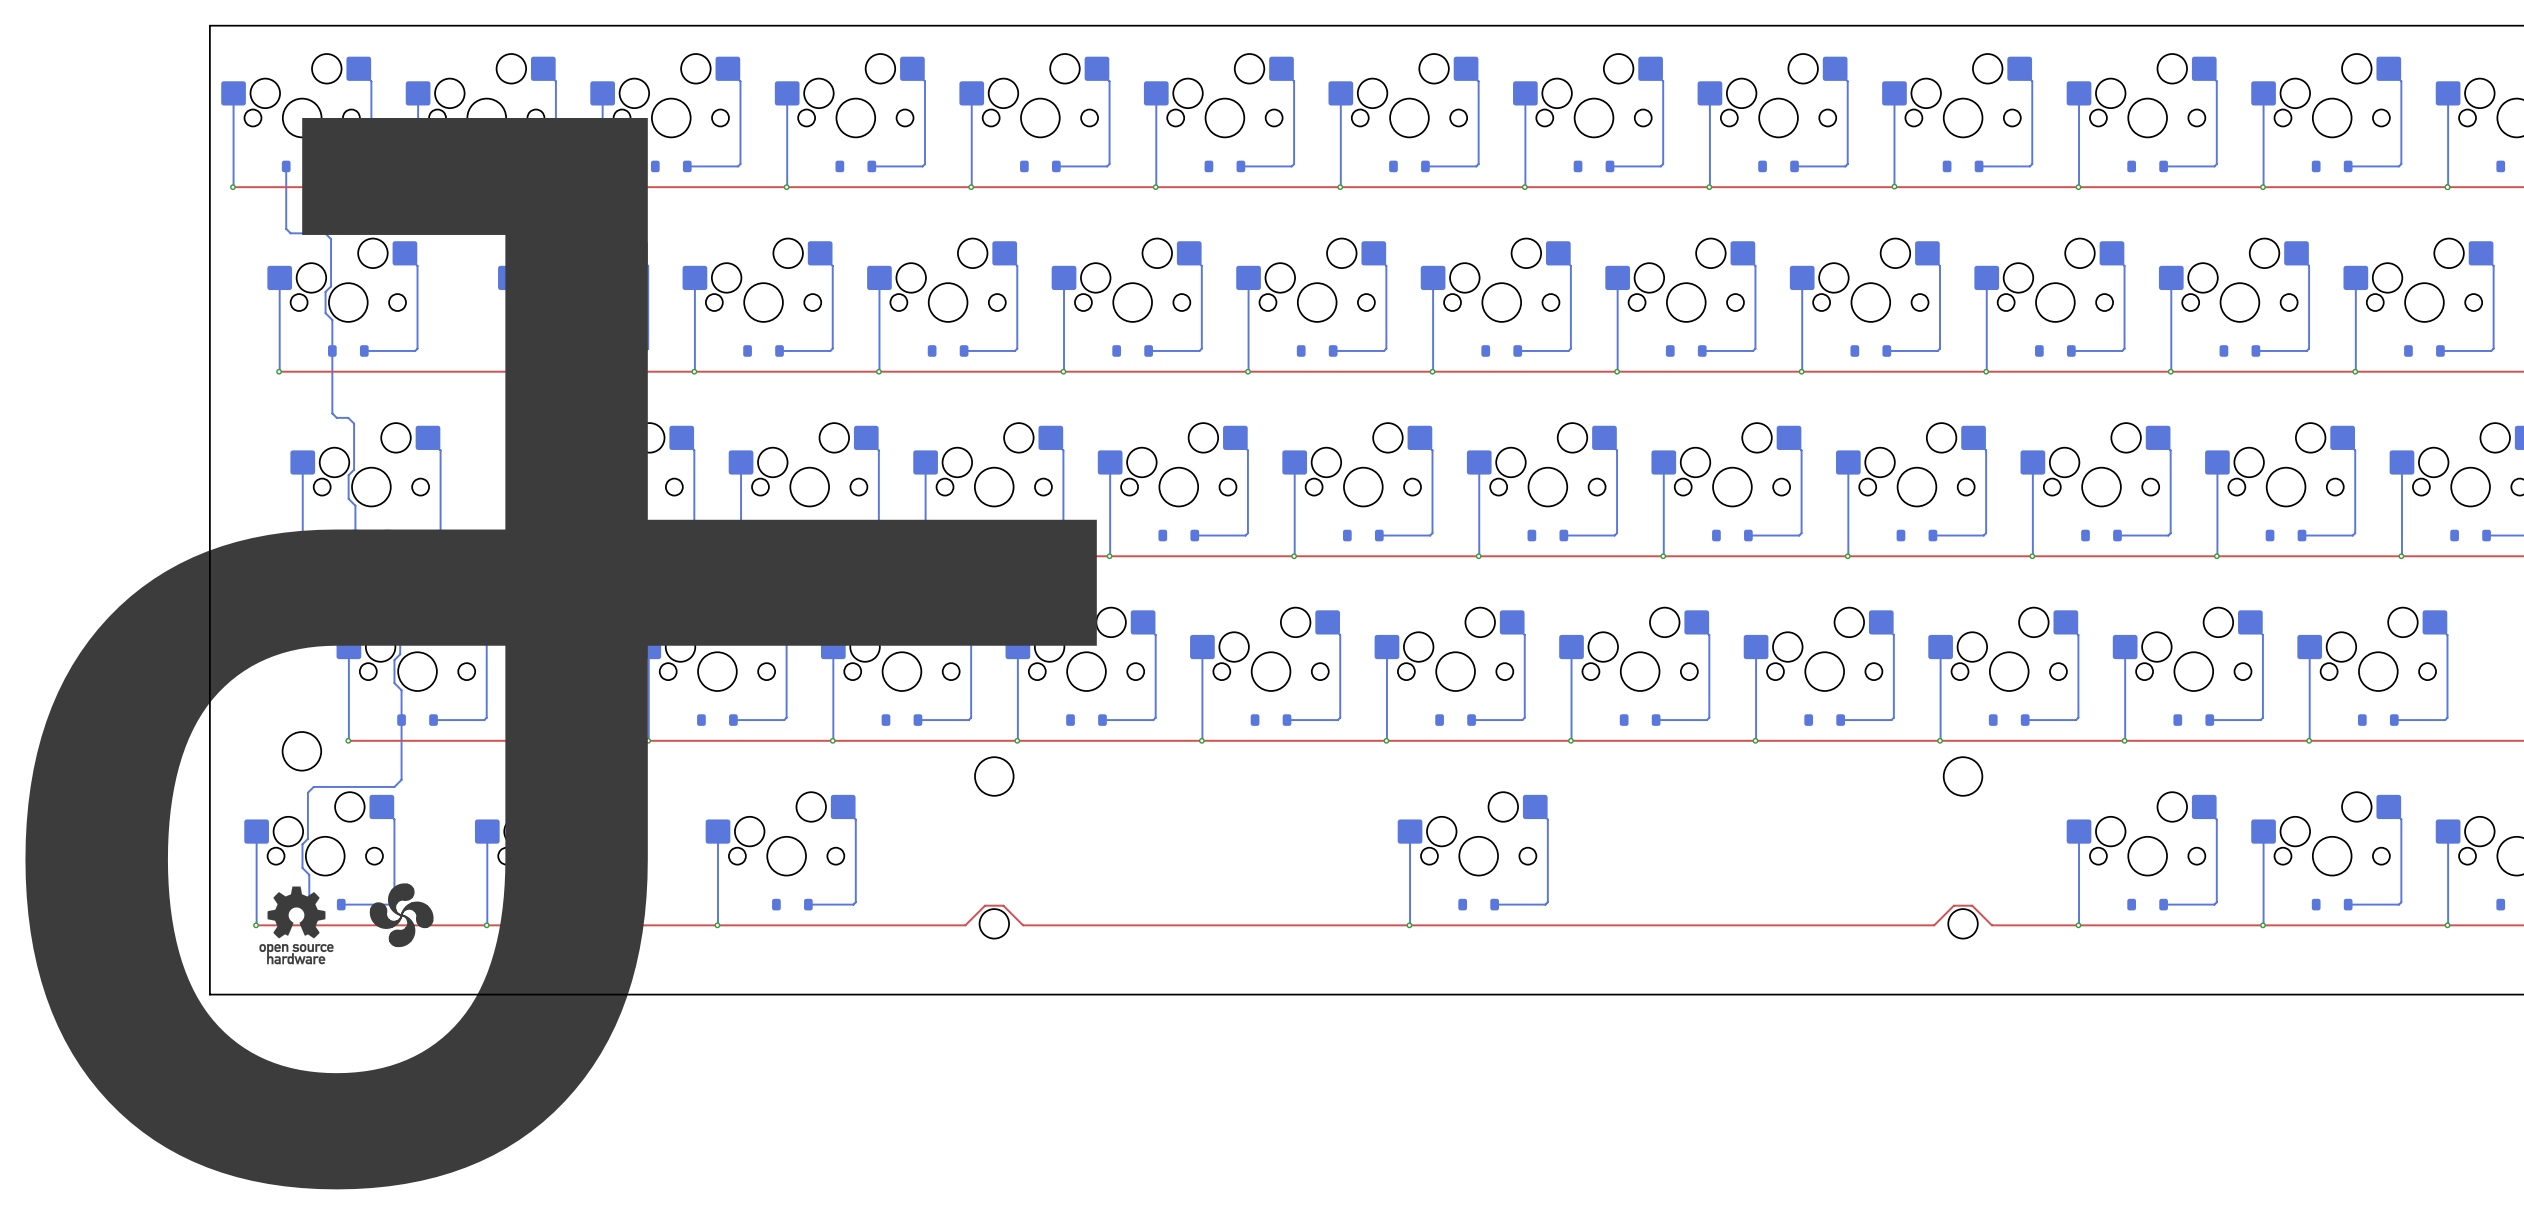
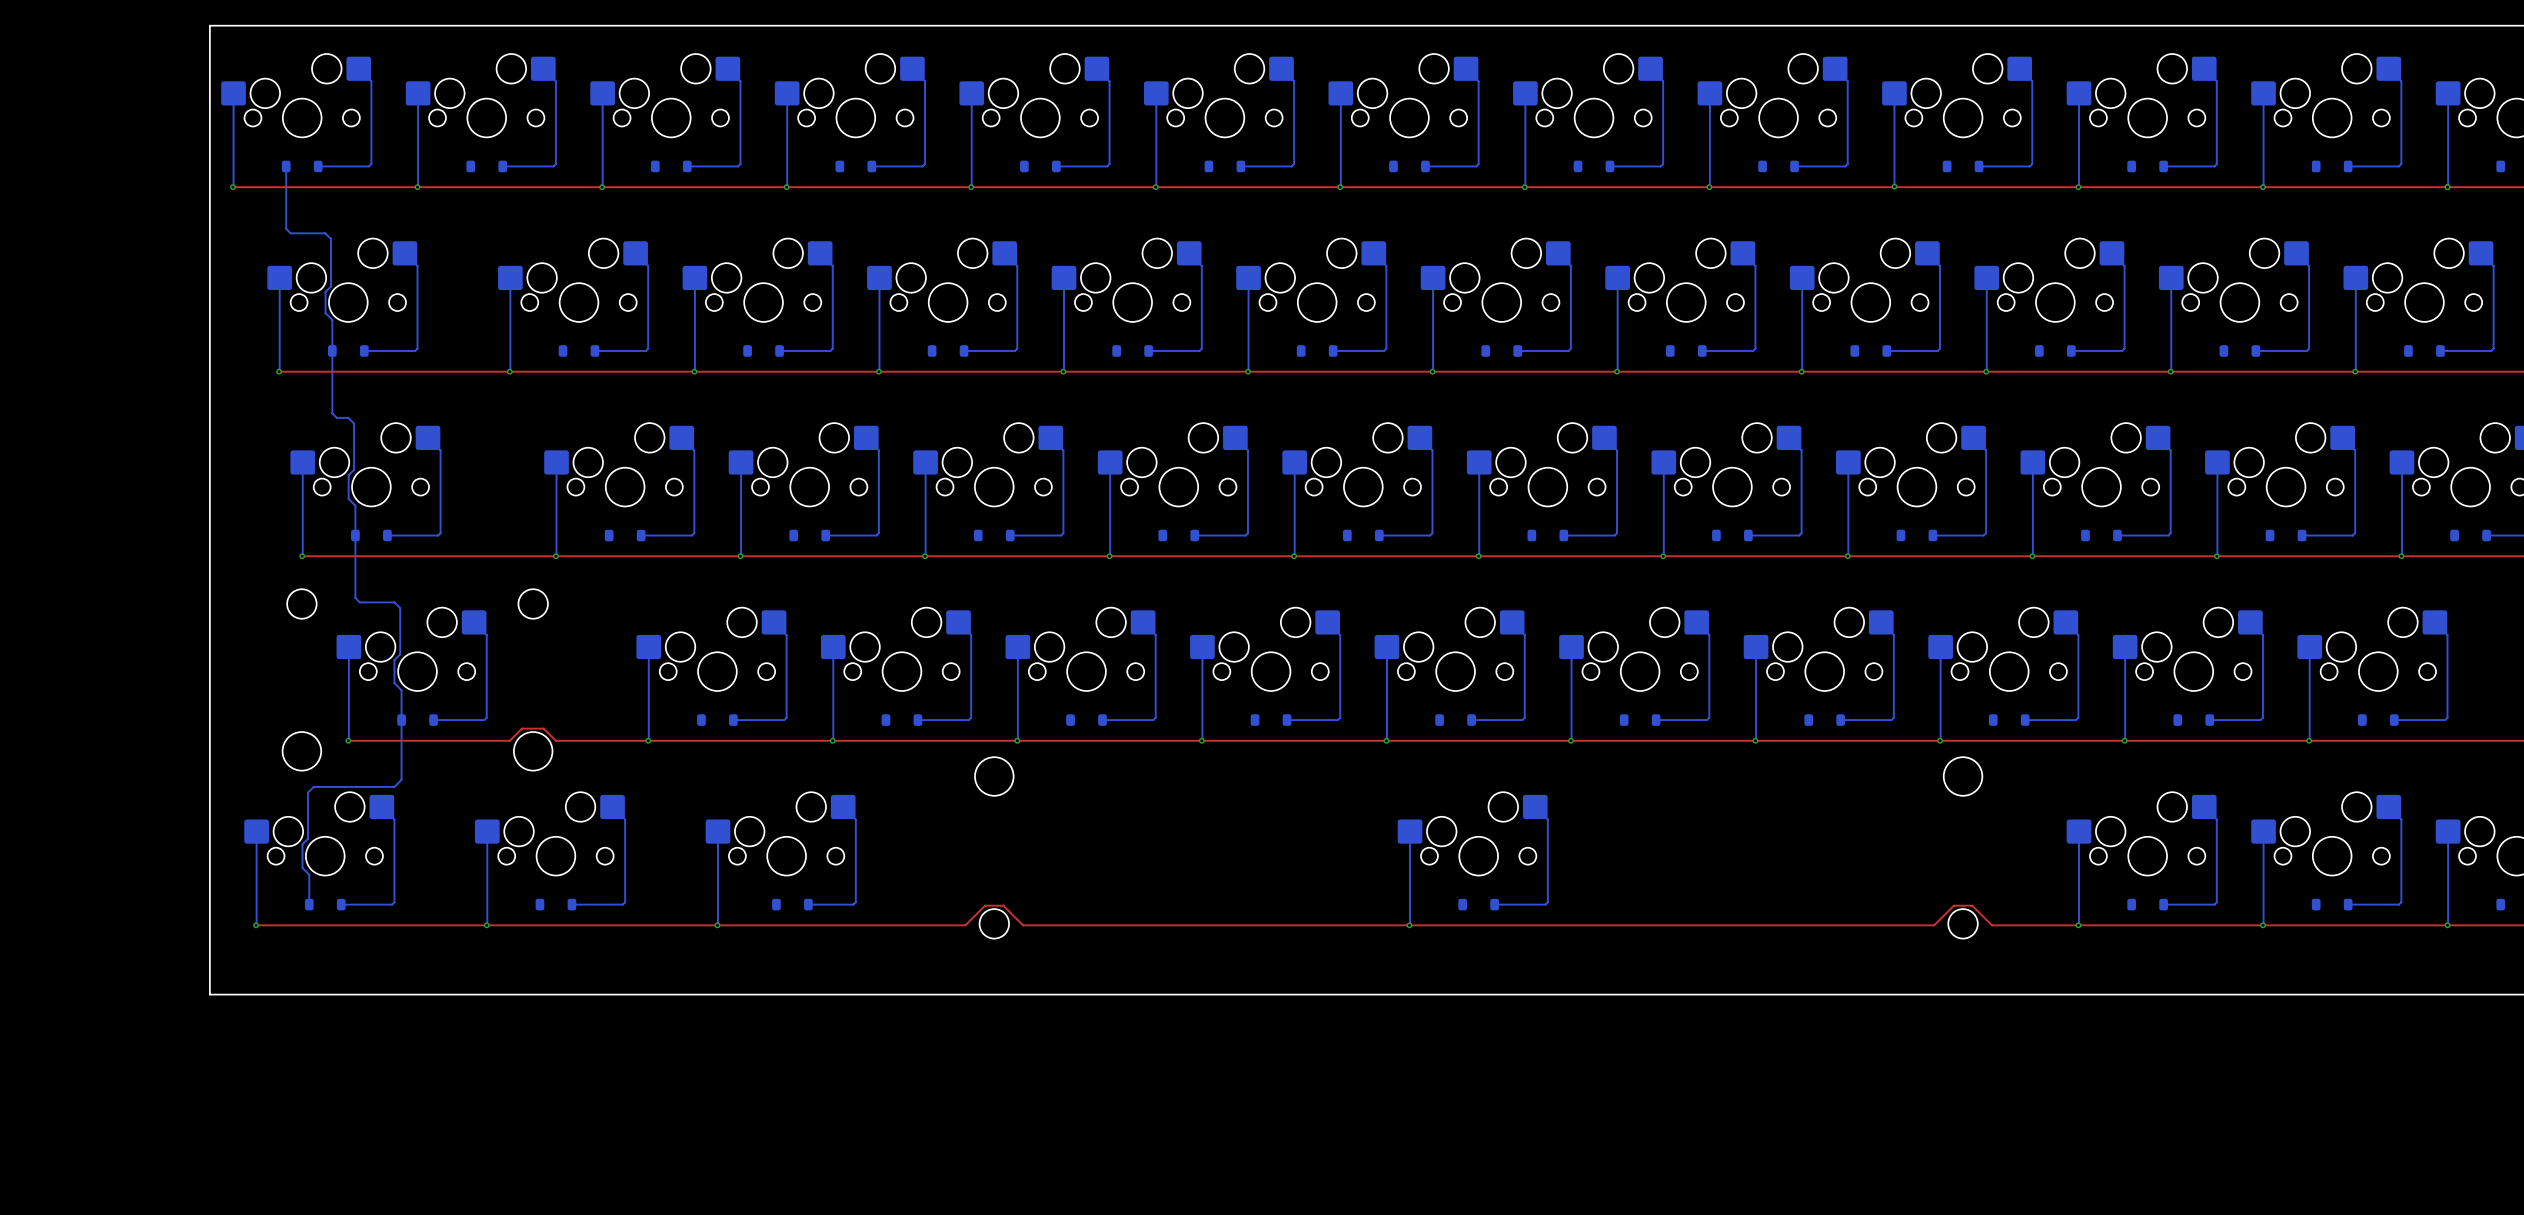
drawing: [25, 117, 1097, 1190] -> none
line: (401, 915) (396, 912) (395, 906) (399, 900) (408, 899) (412, 895) (413, 889) (407, 884) (395, 886) (389, 897) (391, 908) (401, 915) -> none
line: (401, 915) (397, 921) (390, 920) (386, 916) (385, 907) (380, 903) (374, 904) (370, 909) (373, 921) (383, 927) (395, 925) (401, 915) -> none
line: (401, 915) (401, 914) (402, 912) (403, 909) (408, 905) (419, 902) (429, 909) (432, 920) (427, 926) (420, 926) (417, 922) (416, 912) (410, 908) (404, 910) (401, 915) -> none
line: (401, 915) (402, 915) (404, 916) (407, 917) (411, 921) (414, 933) (407, 943) (396, 946) (391, 942) (389, 936) (393, 931) (402, 930) (407, 926) (407, 919) (401, 915) -> none

